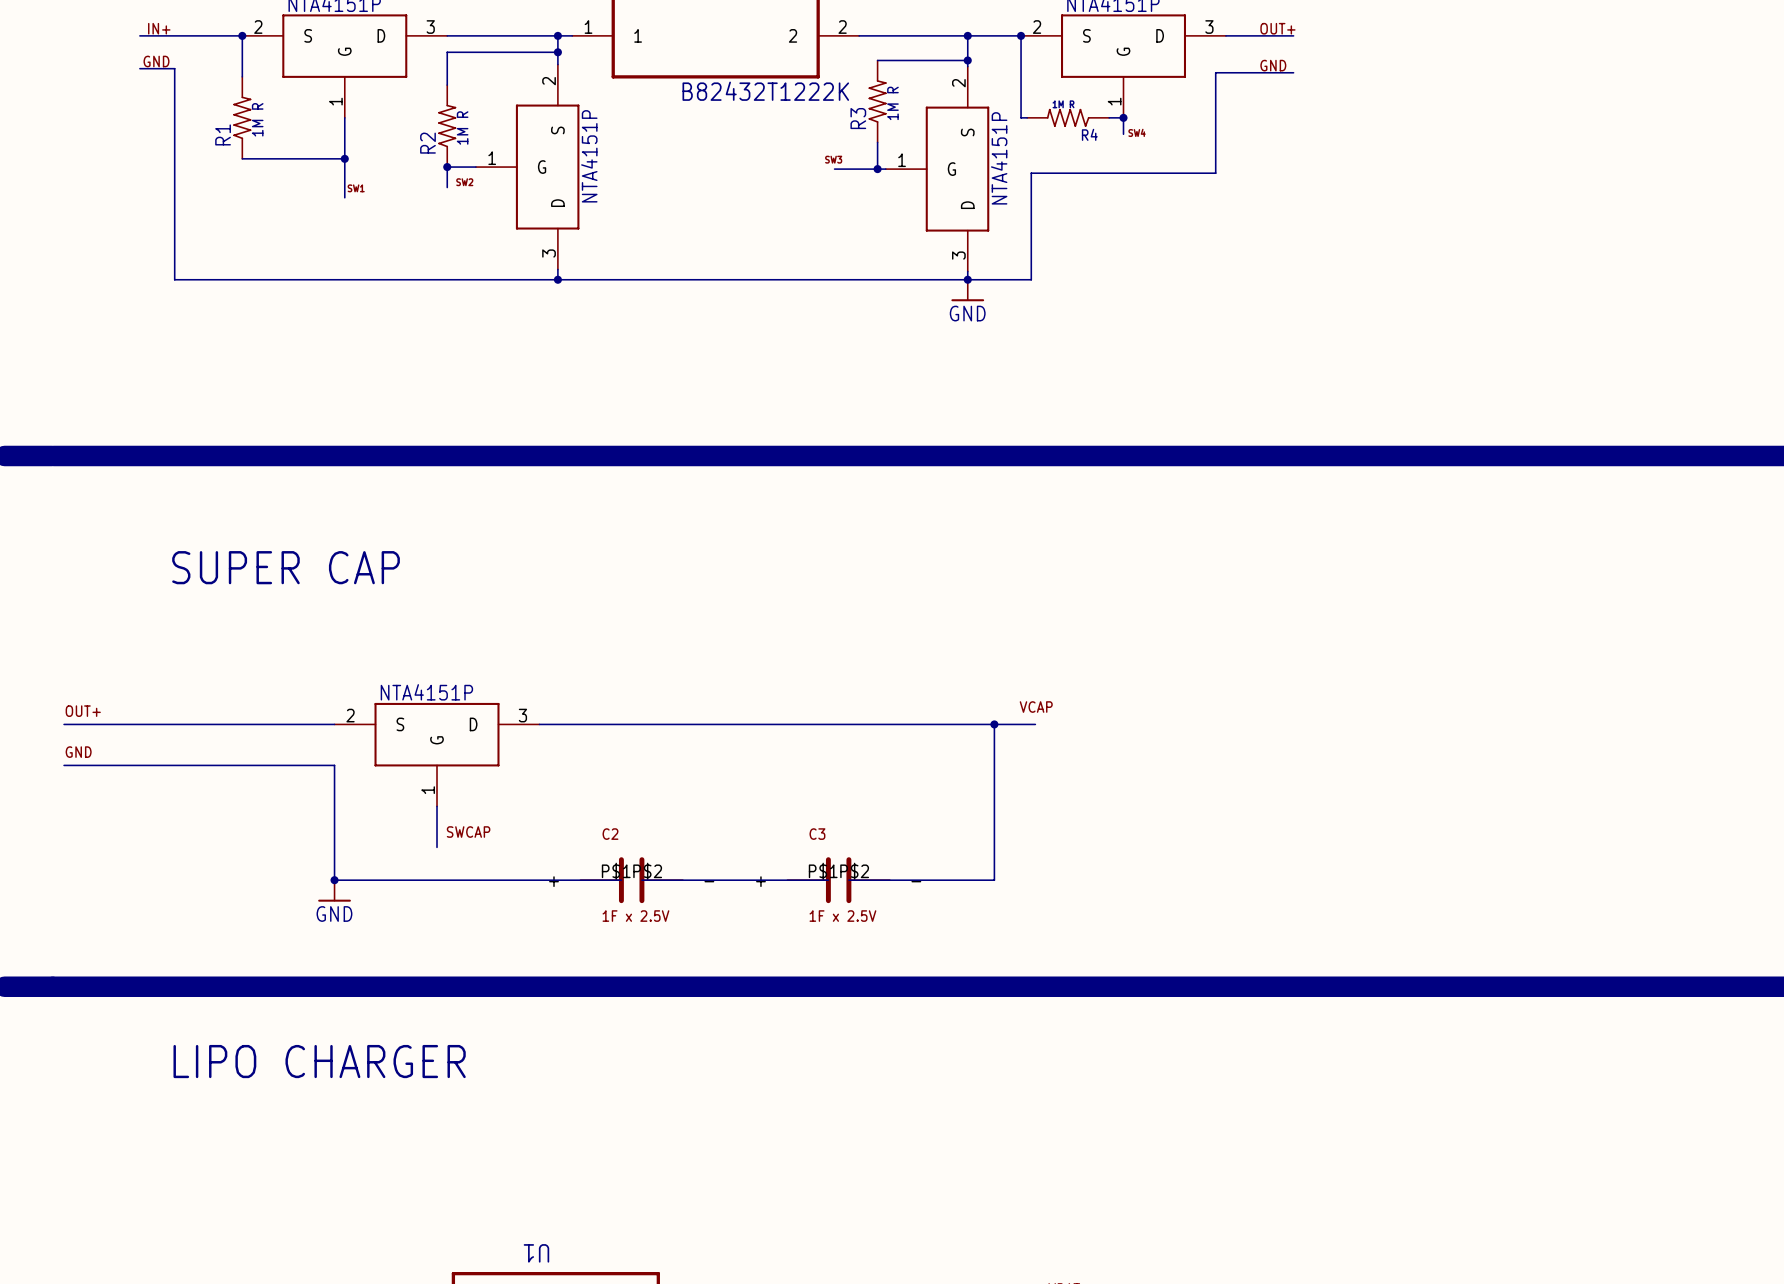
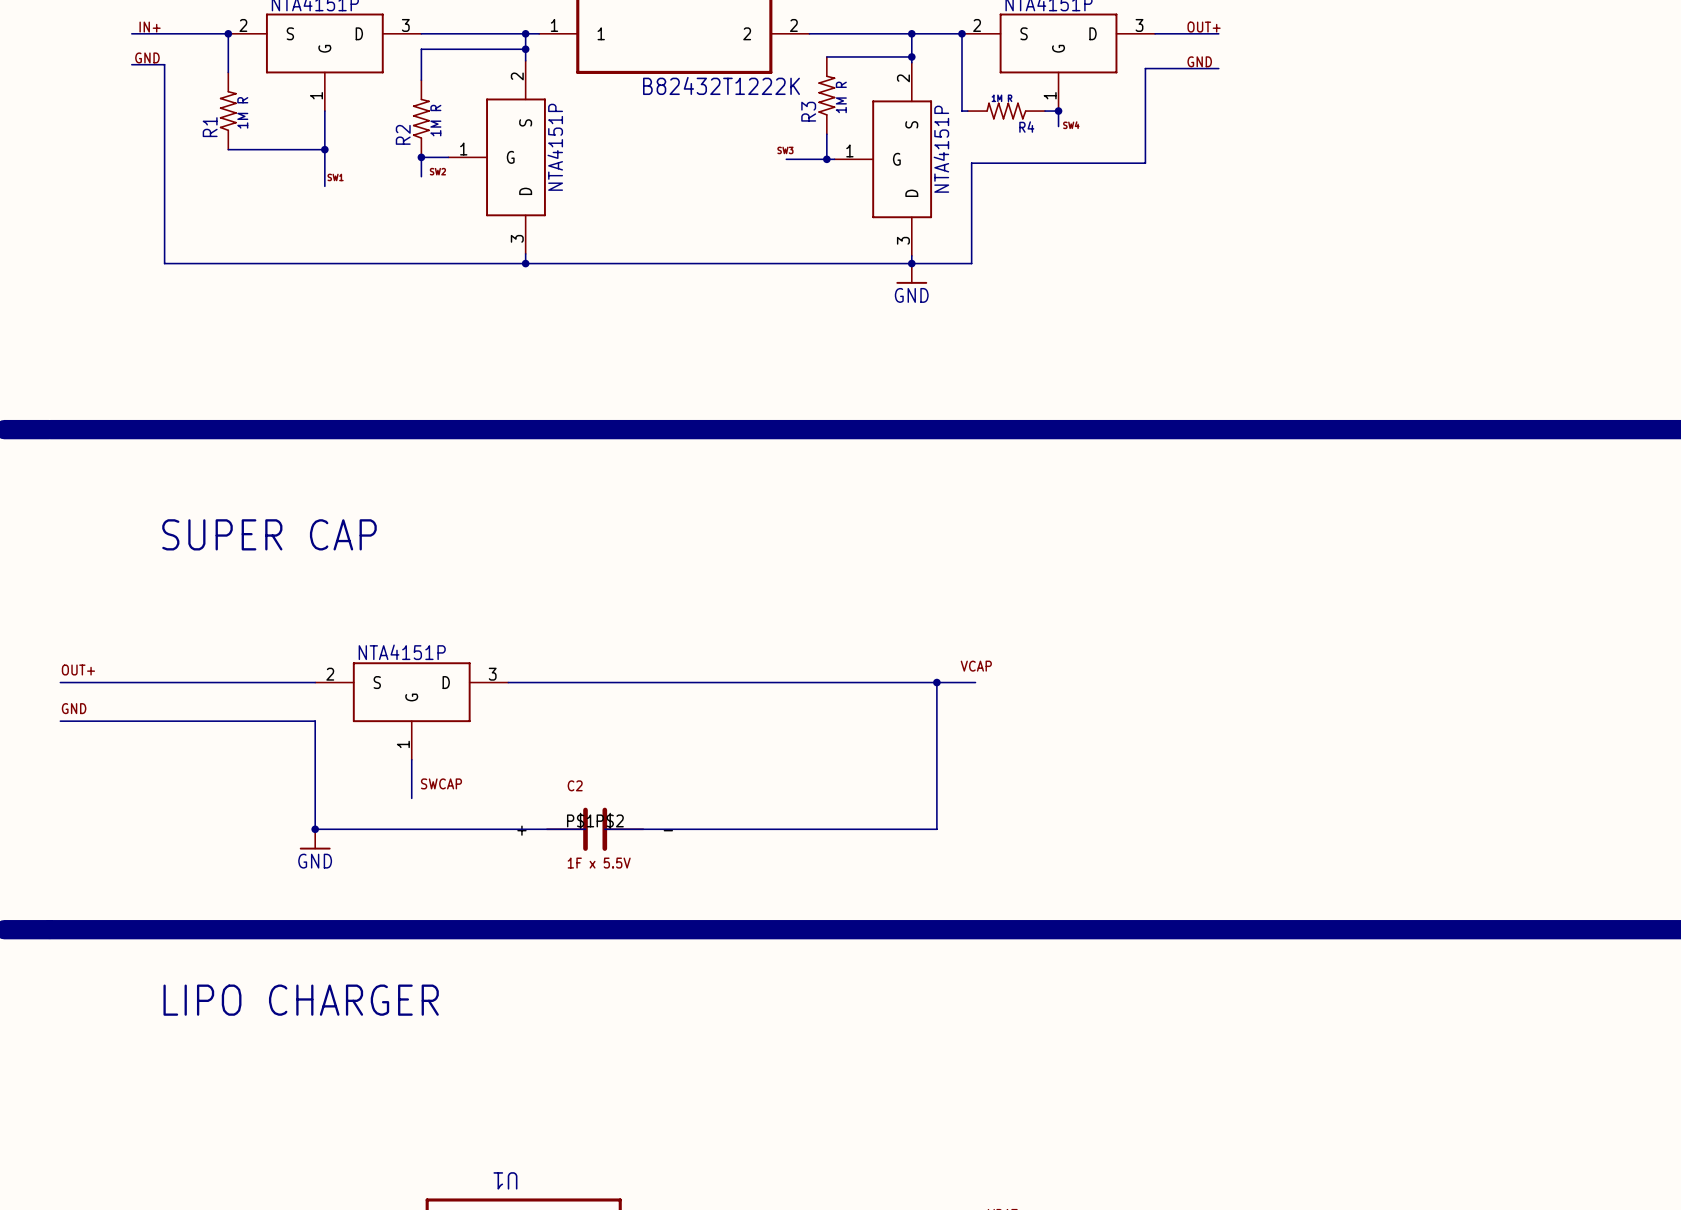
wire: none -> (780, 829) (799, 829)
C3: 1F x 2.5V (838, 880) -> none
C2 value: 1F x 2.5V (635, 916) -> 1F x 5.5V (599, 863)

